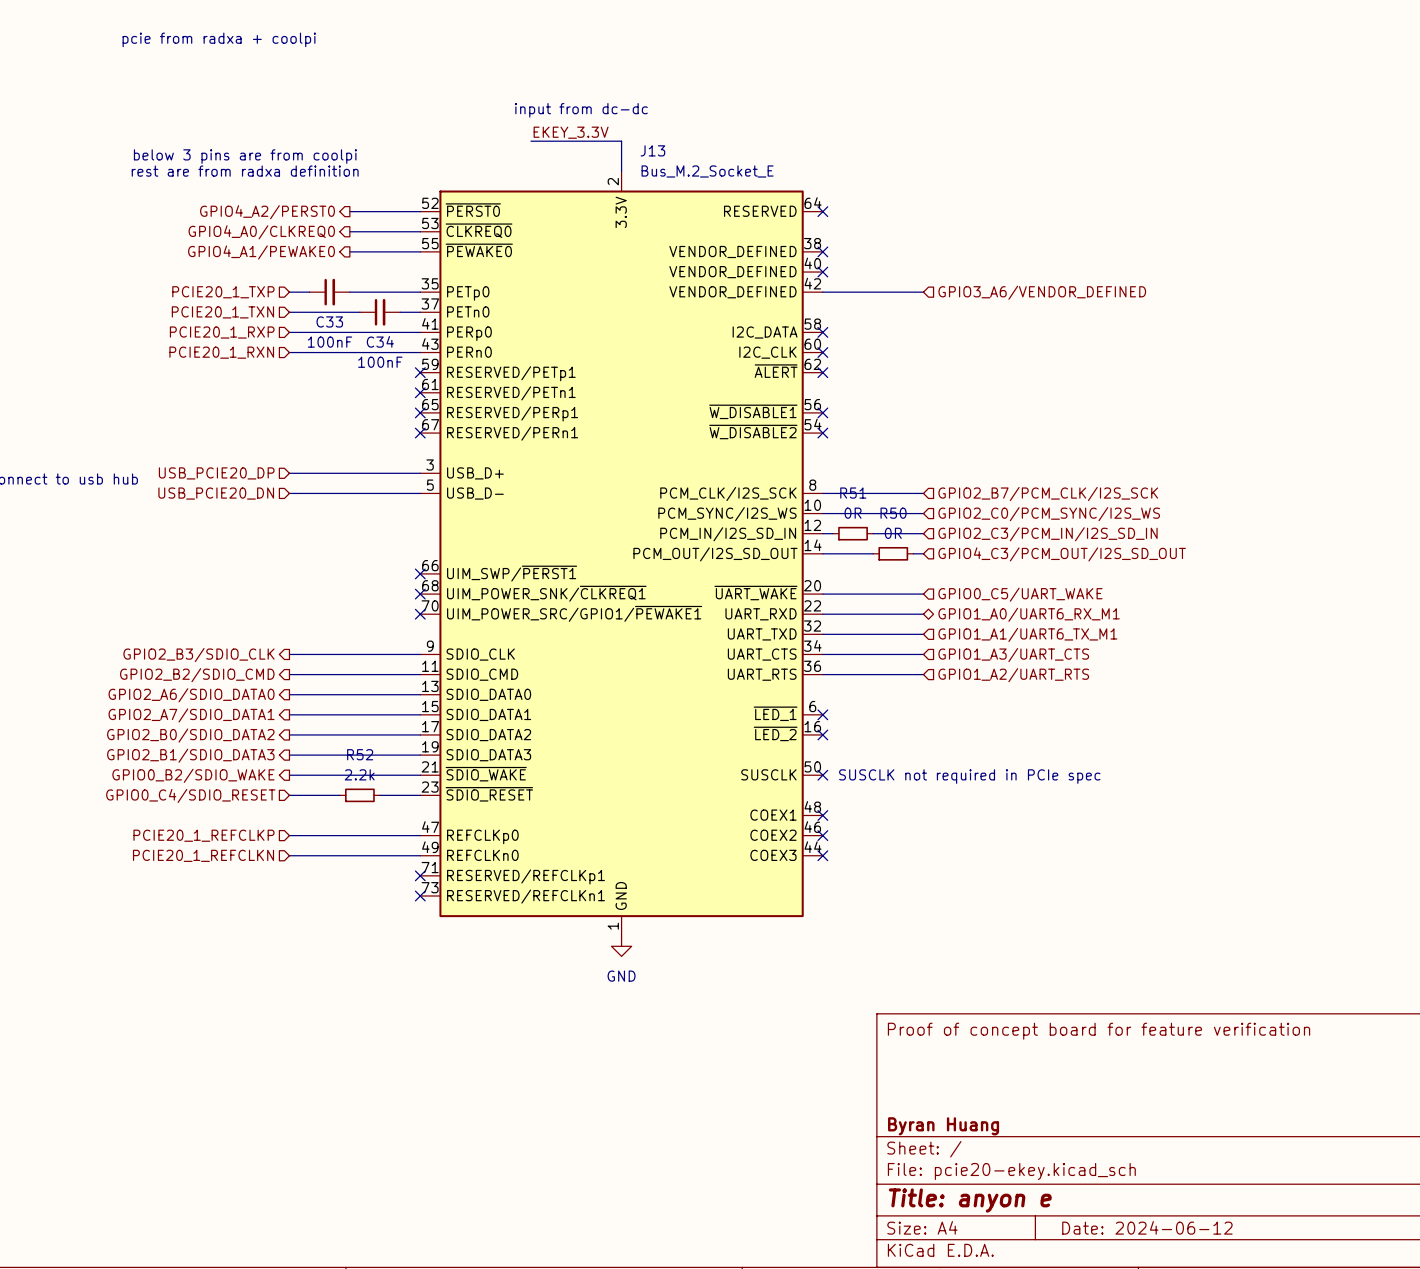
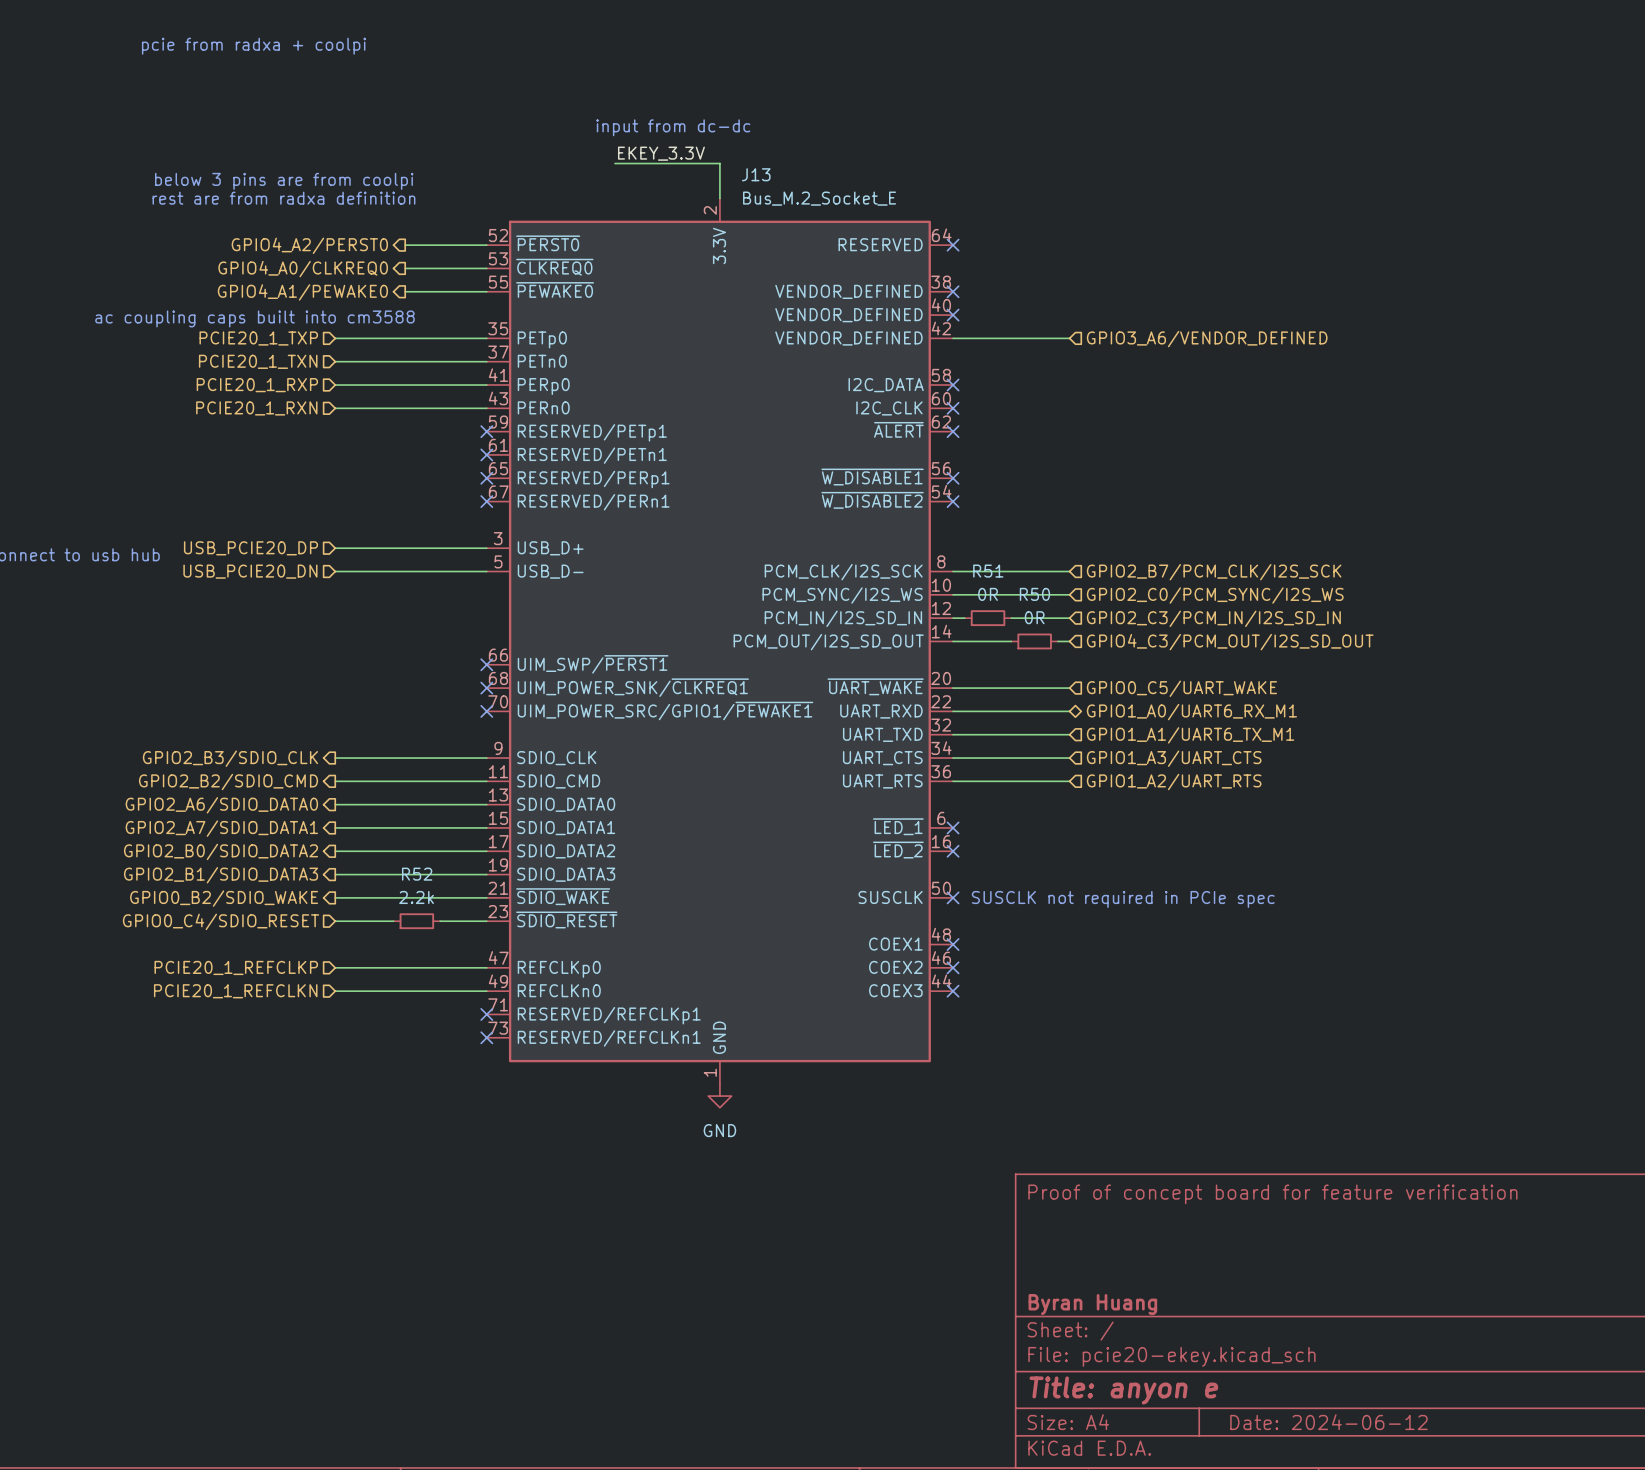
text: none -> ac coupling caps built into cm3588 (254, 318)
C33: 100nF (329, 292) -> none
C34: 100nF (380, 312) -> none

